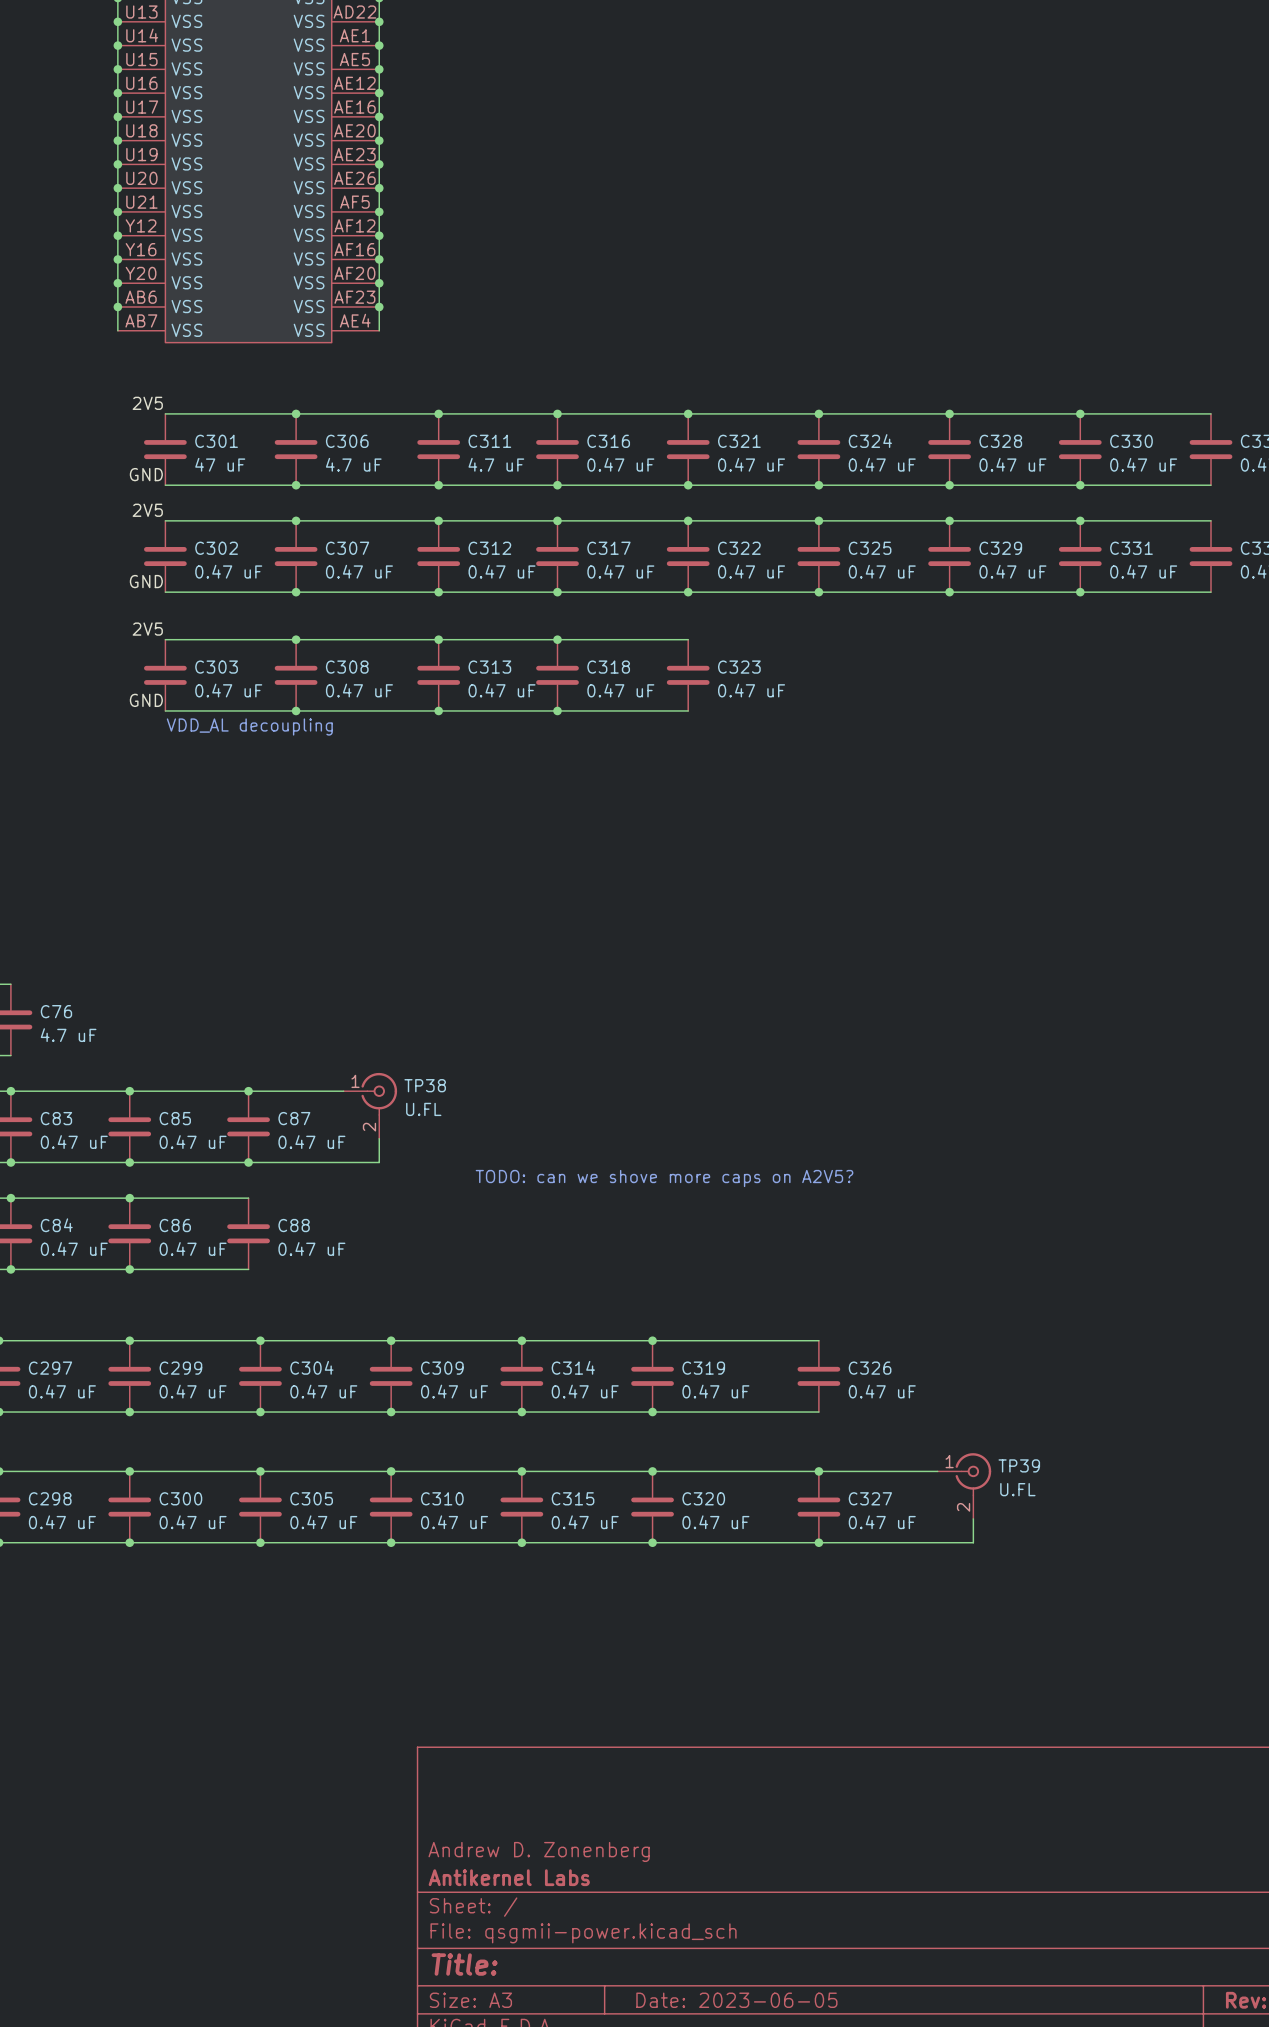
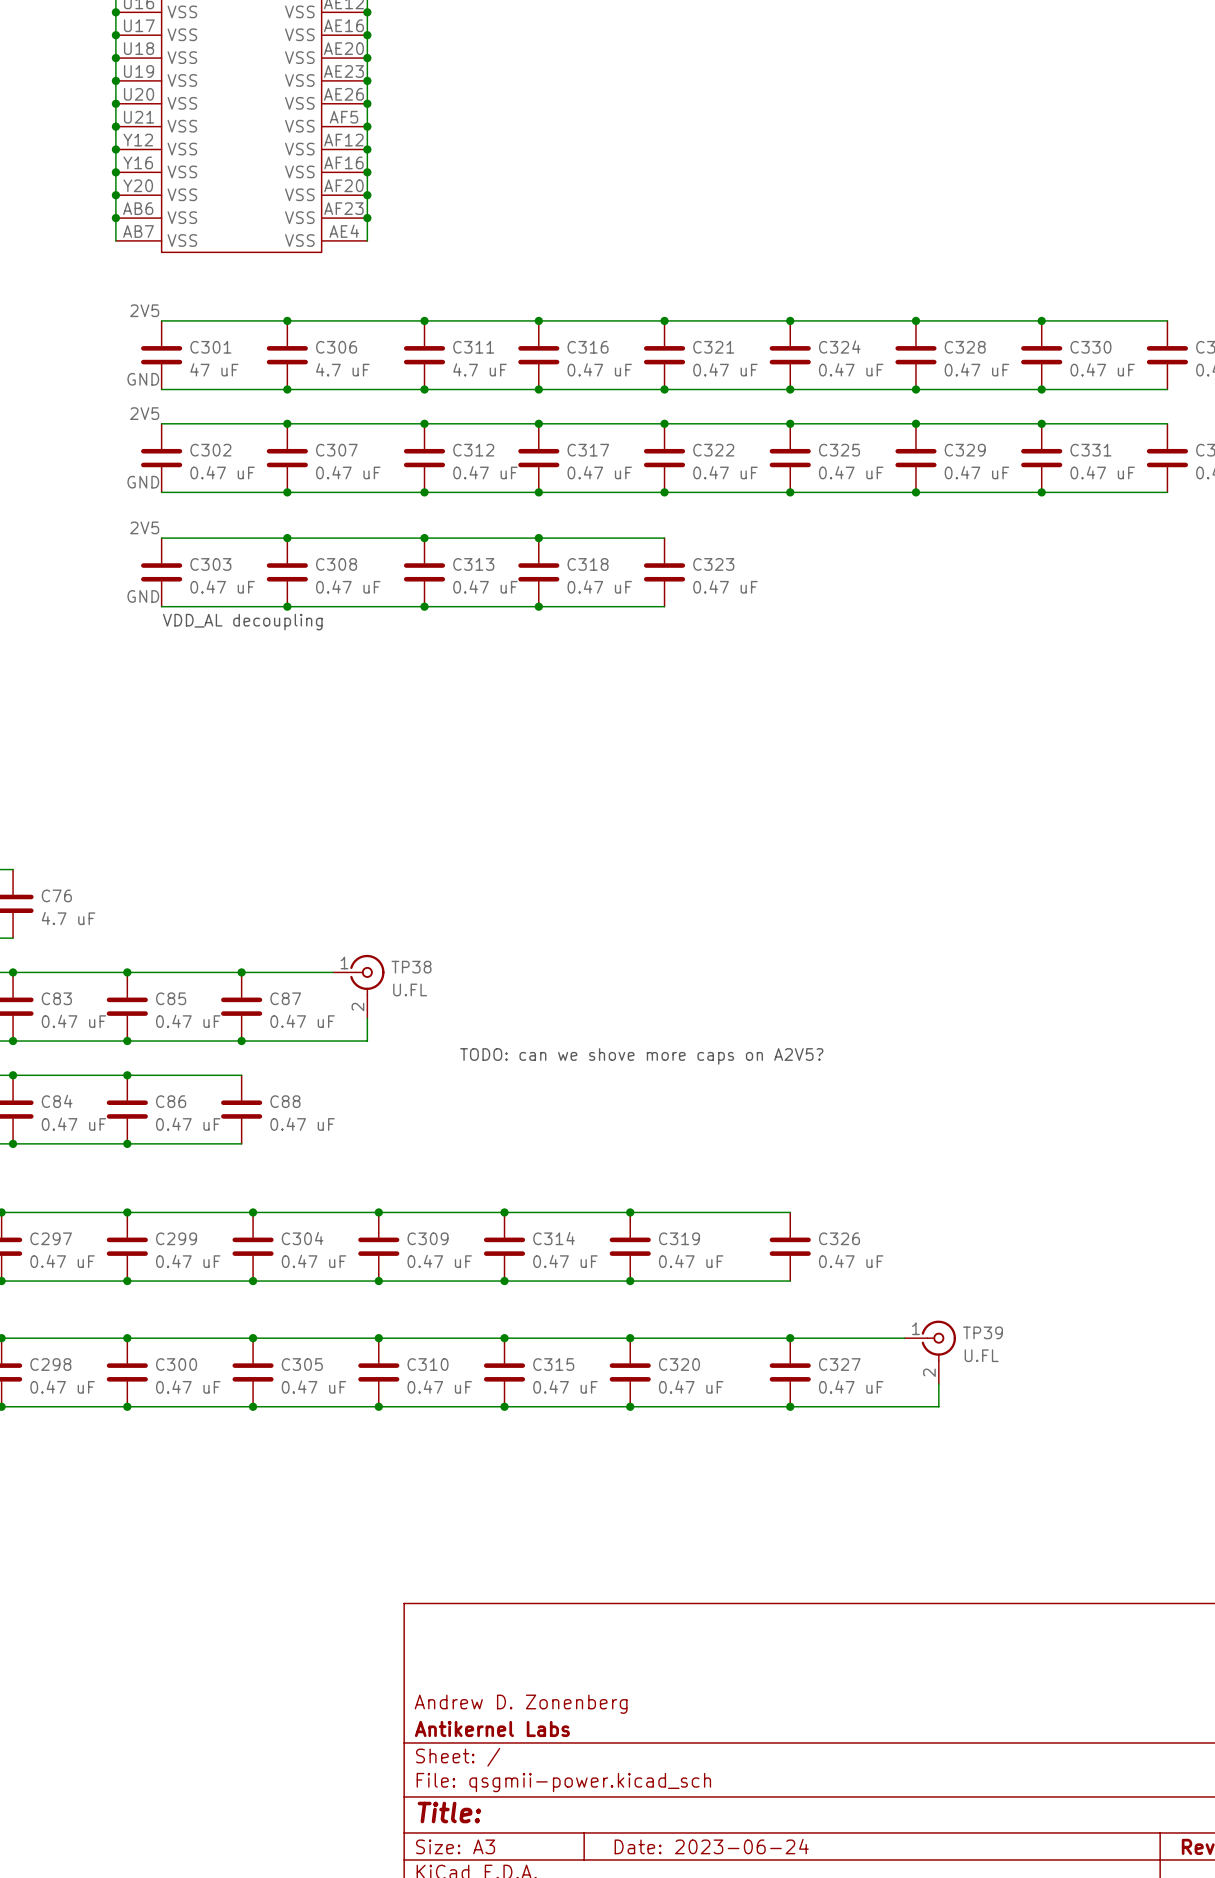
title block: Date: 2023-06-05 (736, 2000) -> Date: 2023-06-24 (711, 1846)

